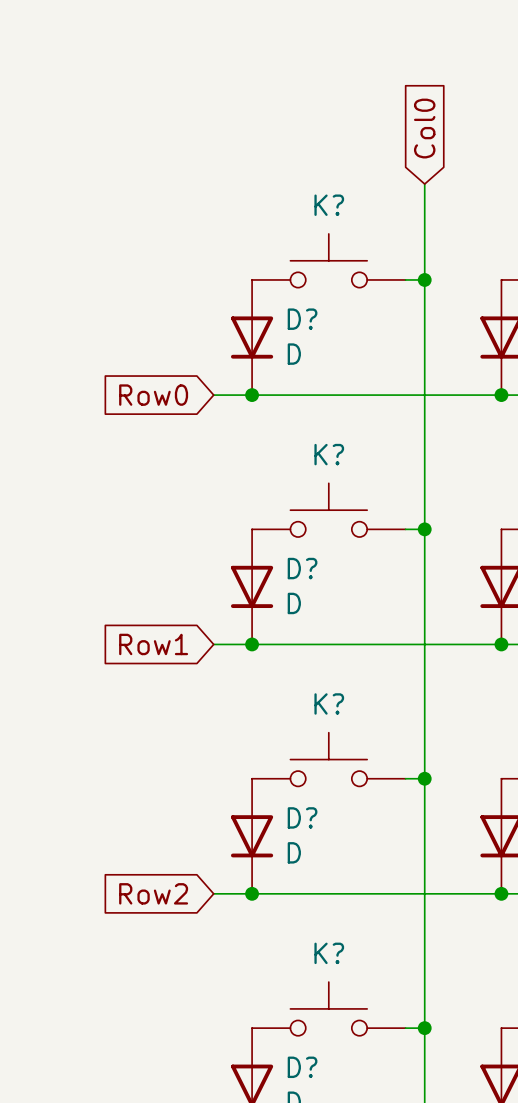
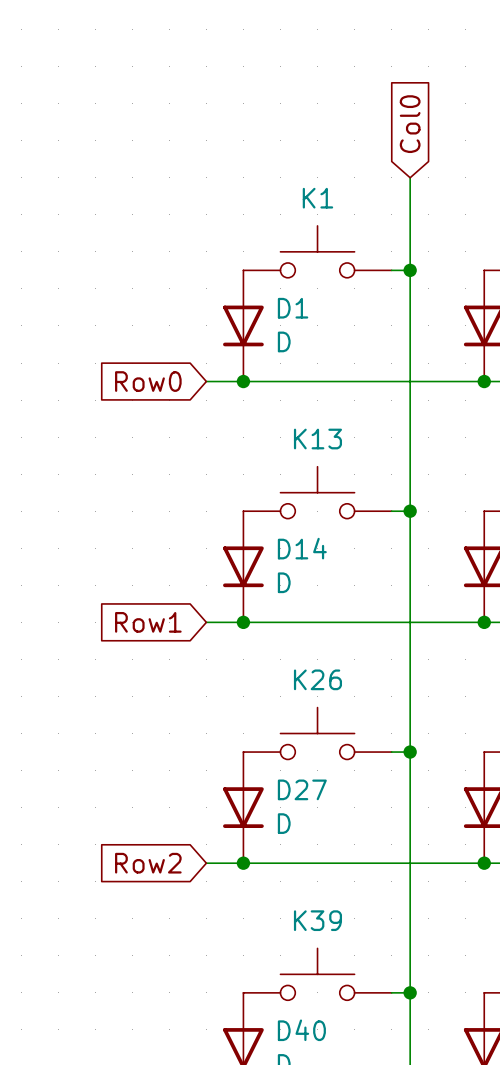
K? name: K? (329, 205) -> K1 (317, 198)
D? name: D? (302, 319) -> D1 (293, 308)
K? name: K? (329, 454) -> K13 (317, 439)
D? name: D? (302, 568) -> D14 (302, 548)
K? name: K? (329, 703) -> K26 (317, 679)
D? name: D? (302, 817) -> D27 (302, 789)
K? name: K? (329, 953) -> K39 (317, 920)
D? name: D? (302, 1067) -> D40 (301, 1030)

